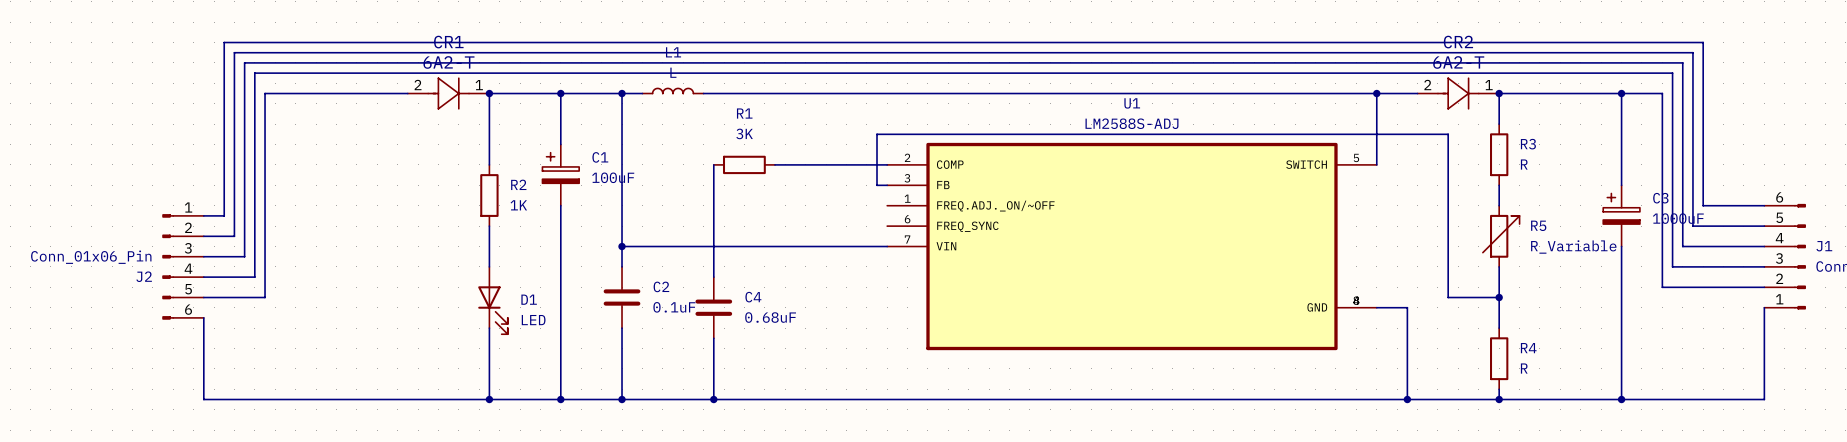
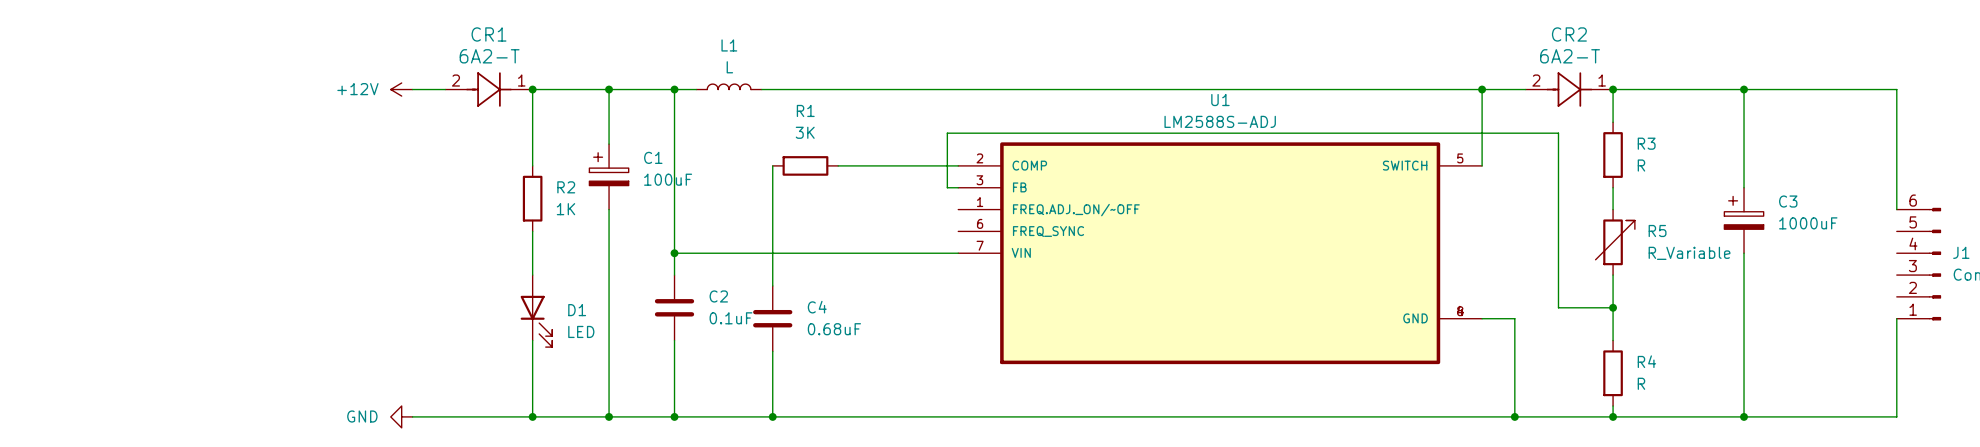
power symbol: none -> +12V (401, 89)
wire: (377, 93) (265, 93) (265, 297) (203, 297) -> none
wire: (1662, 93) (1662, 287) (1764, 287) -> (1787, 89) (1896, 89) (1896, 209)
wire: (1764, 205) (1703, 205) (1703, 42) (224, 42) (224, 215) (203, 215) -> none
wire: (1764, 226) (1692, 226) (1692, 52) (234, 52) (234, 236) (203, 236) -> none
wire: (1764, 246) (1682, 246) (1682, 62) (244, 62) (244, 256) (203, 256) -> none
J2: Conn_01x06_Pin (183, 266) -> none
wire: (1764, 266) (1672, 266) (1672, 73) (254, 73) (254, 277) (203, 277) -> none
wire: (203, 317) (203, 399) (377, 399) -> none
power symbol: none -> GND (401, 416)

